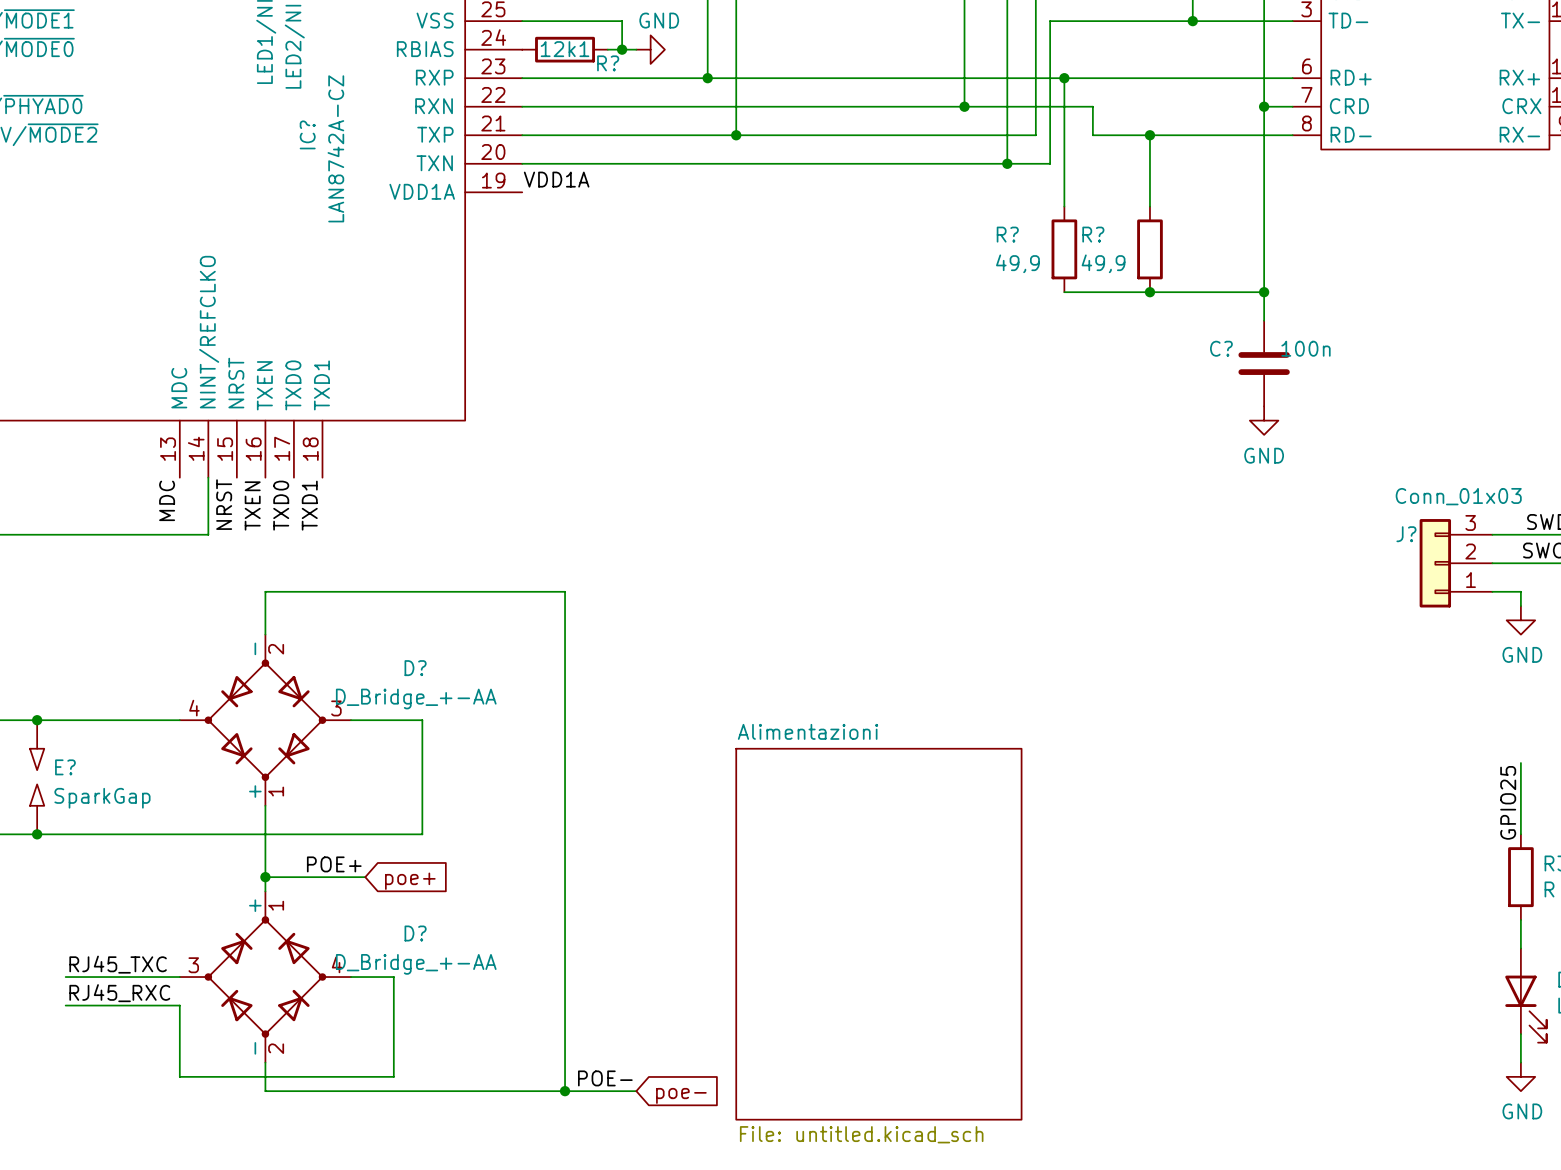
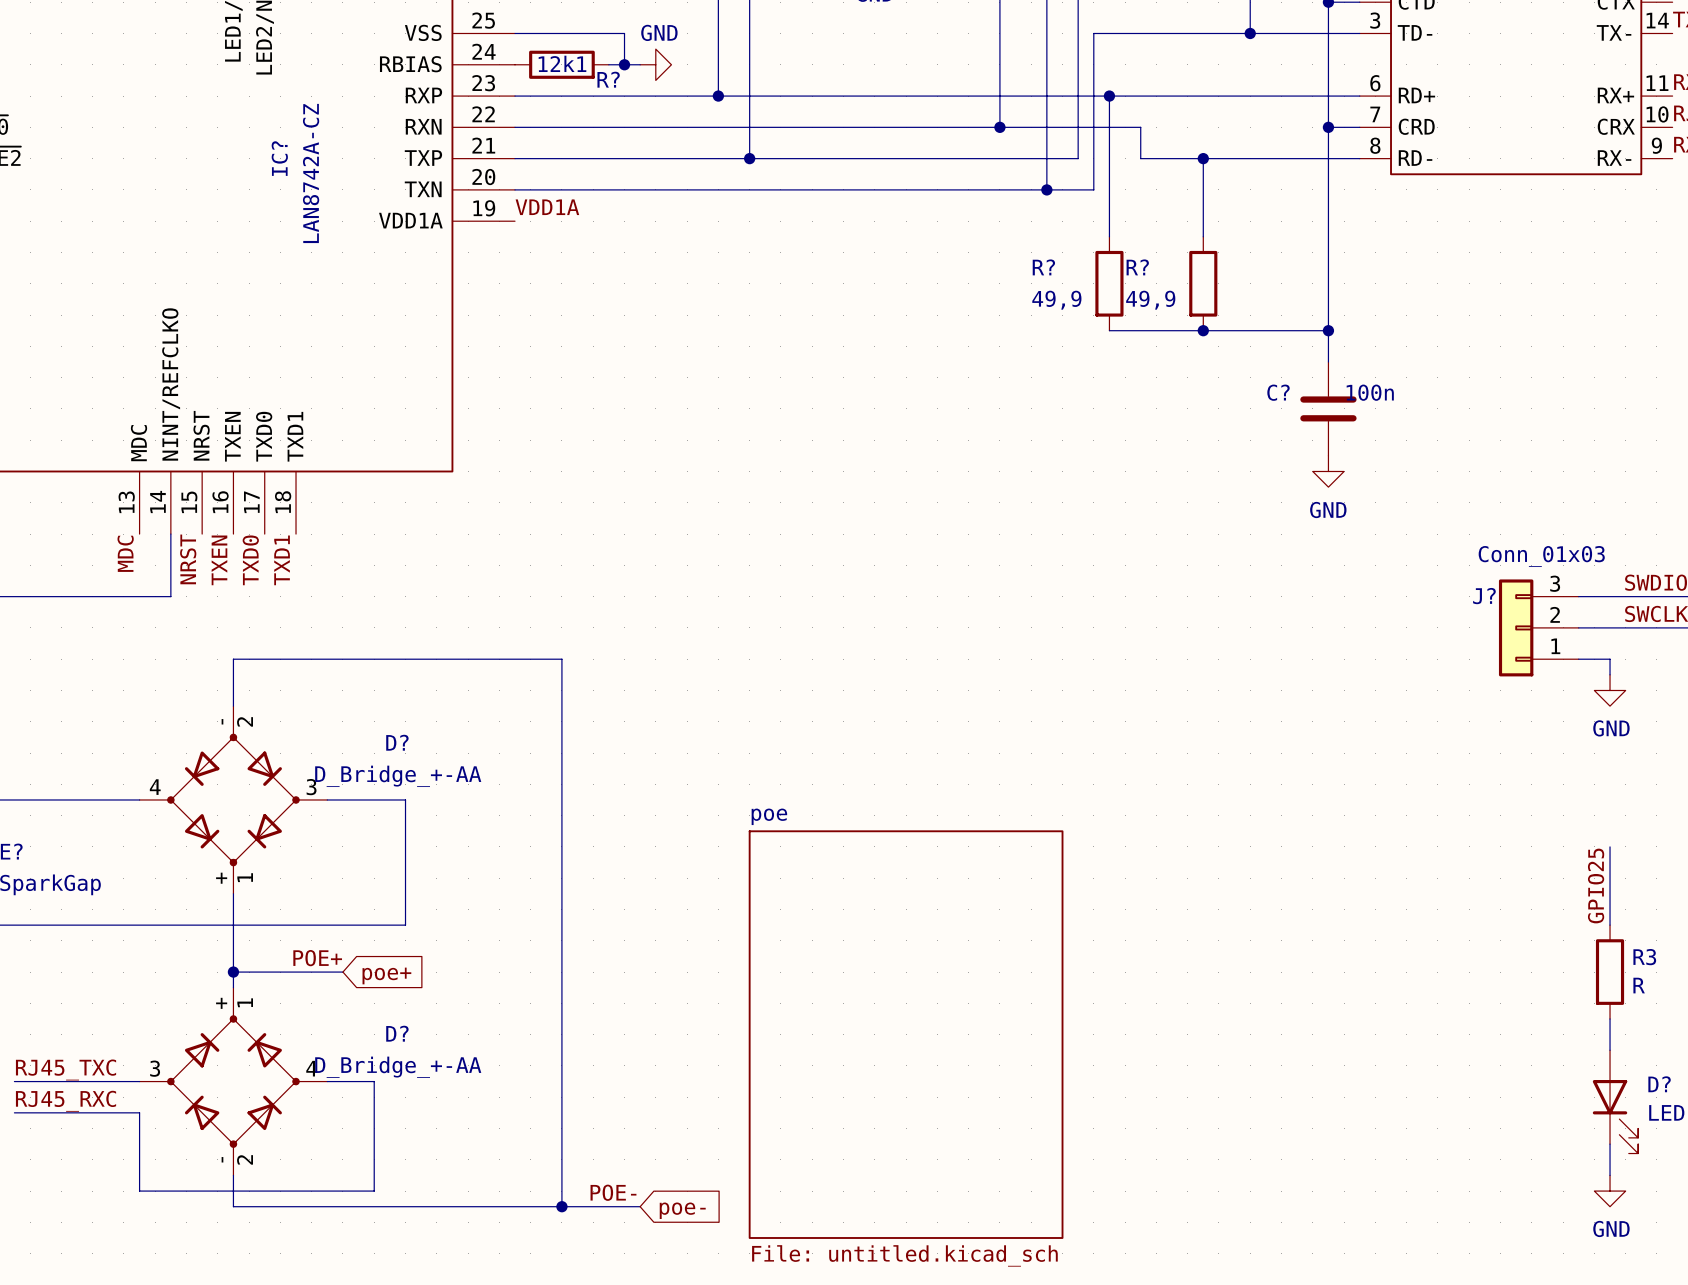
sheet Alimentazioni name: Alimentazioni (808, 731) -> poe (769, 816)

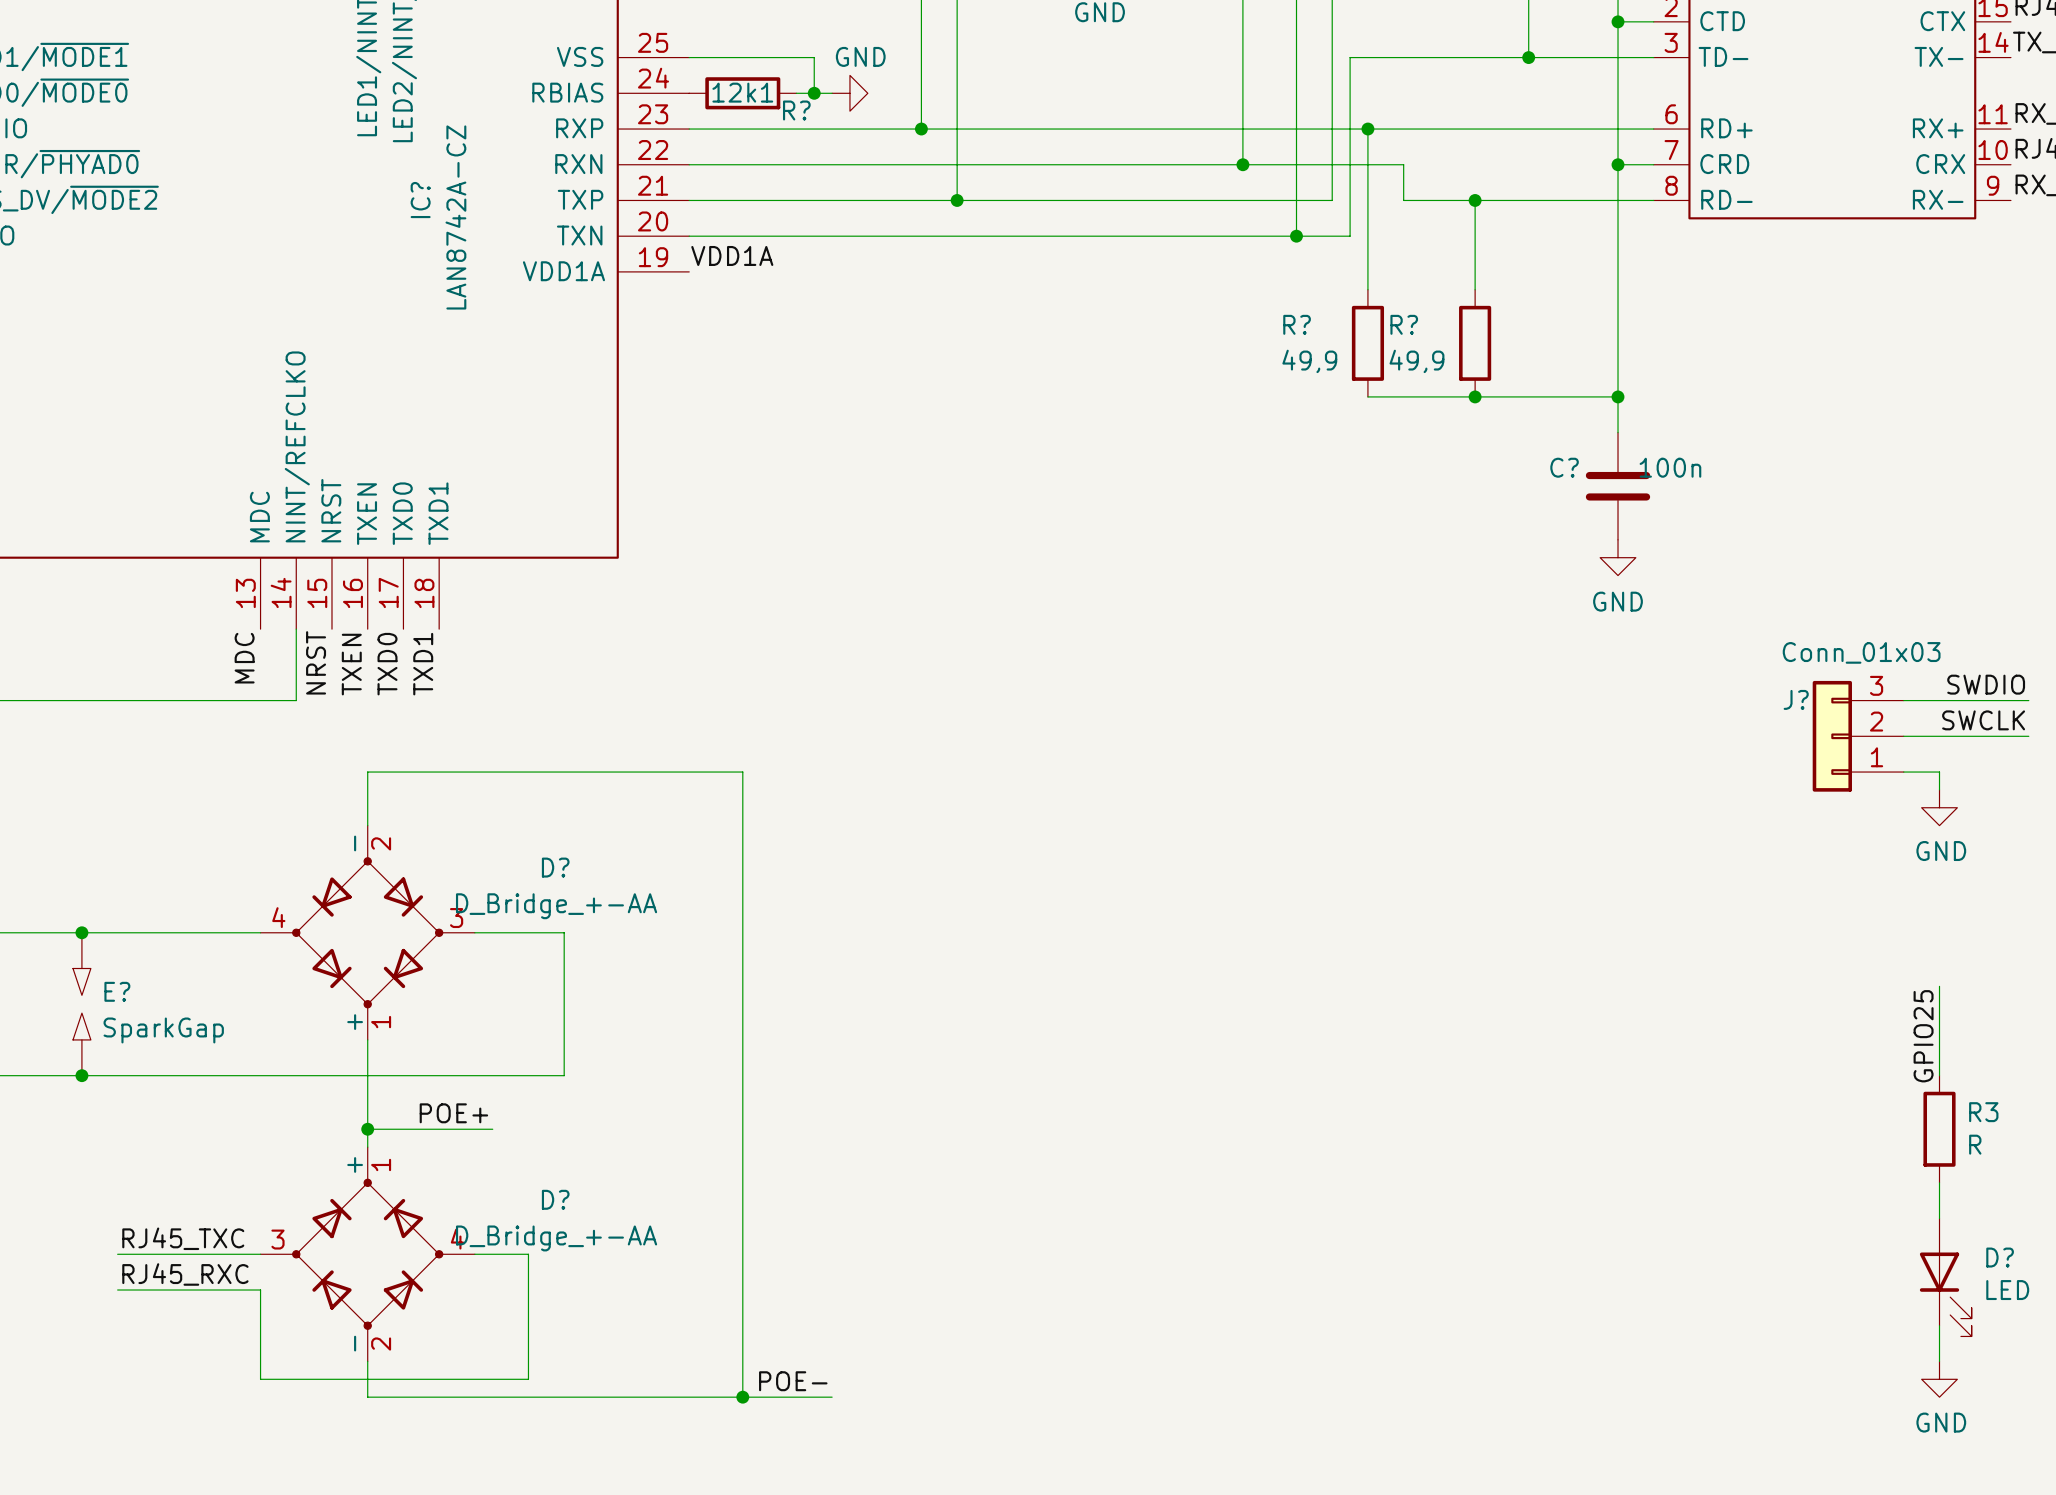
global label: poe+ (386, 975) -> none
sheet poe: File: untitled.kicad_sch (906, 1034) -> none
global label: poe- (682, 1210) -> none

